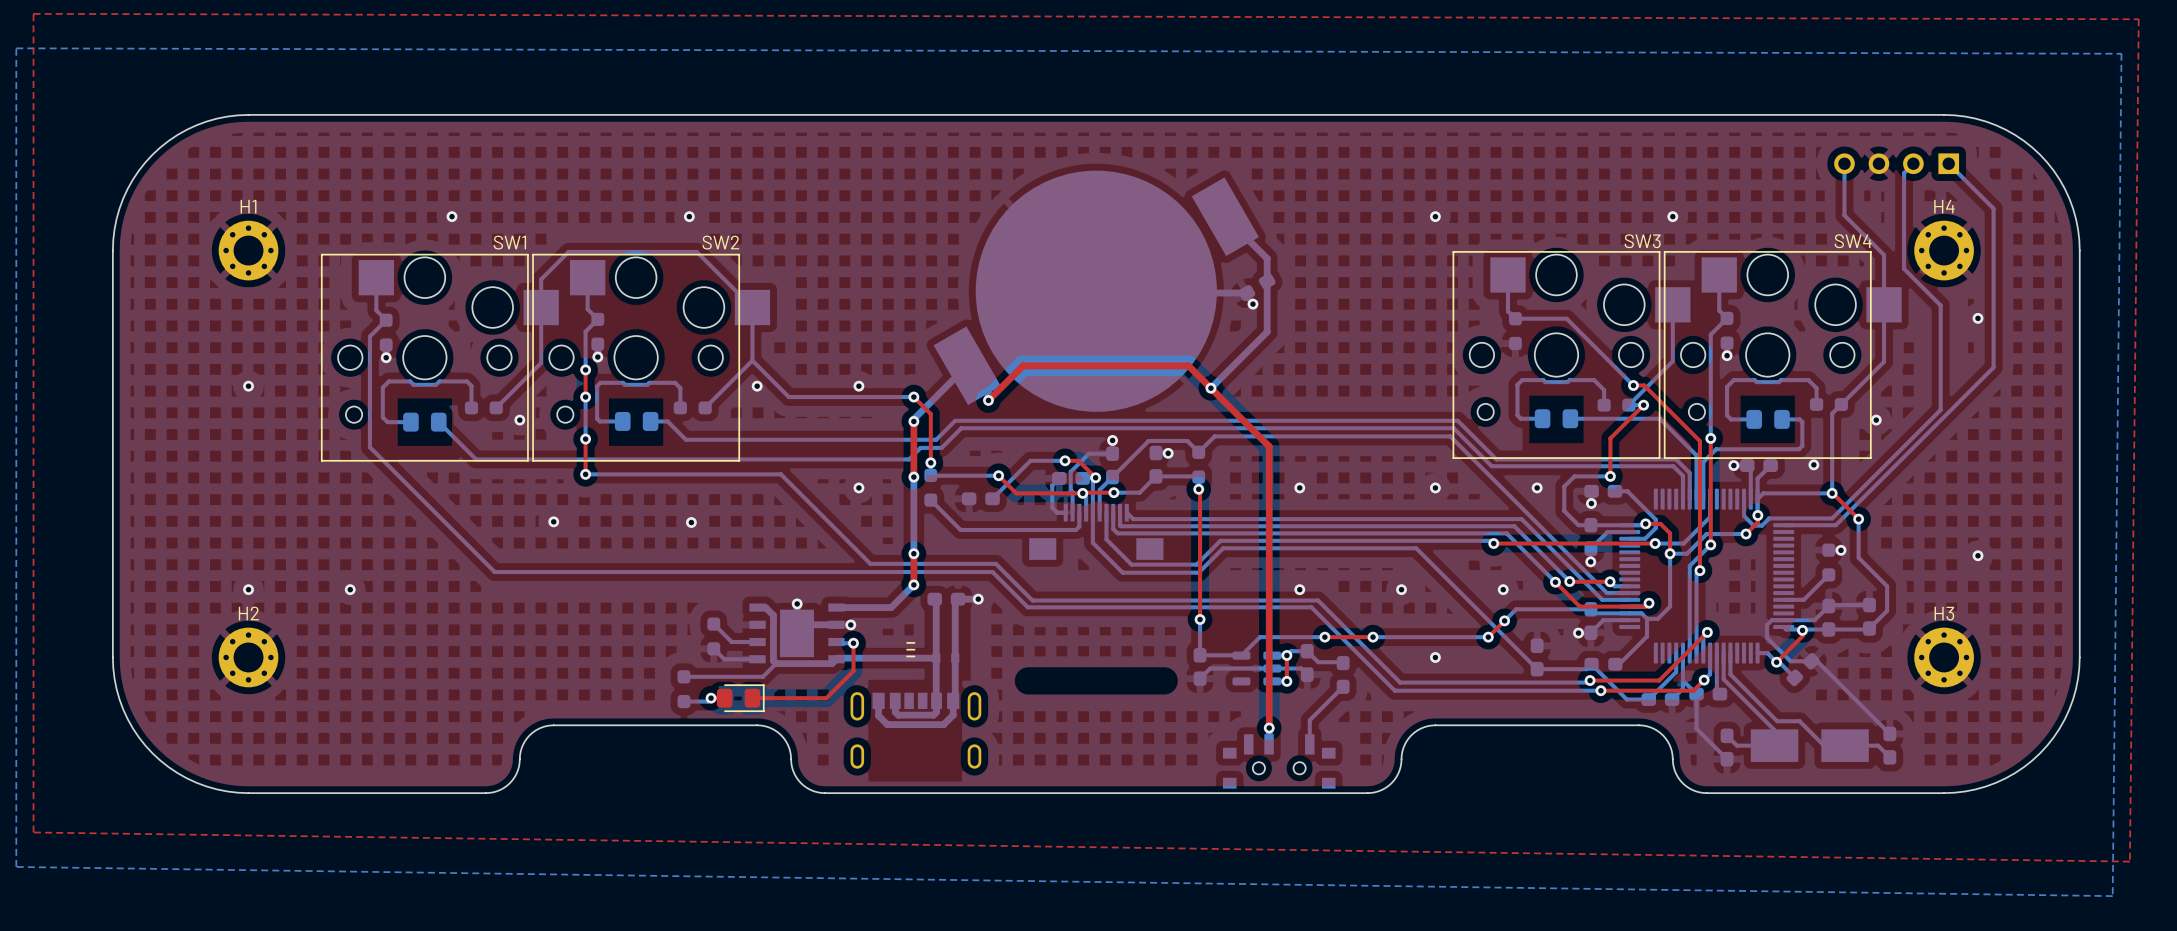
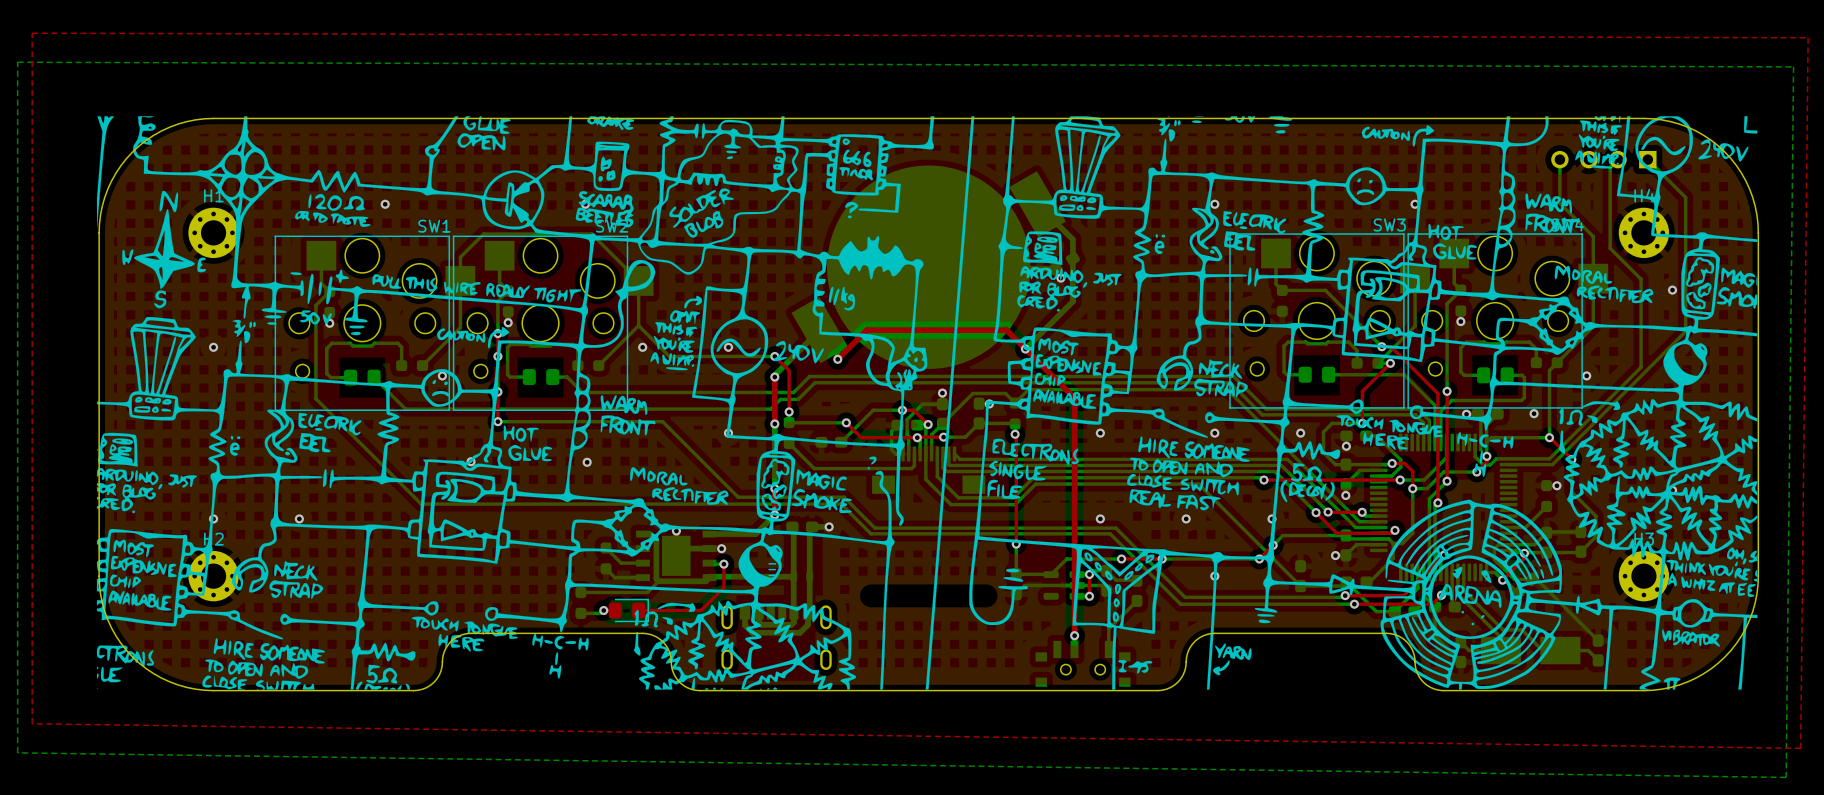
drawing: none -> [96, 116, 1758, 690]

